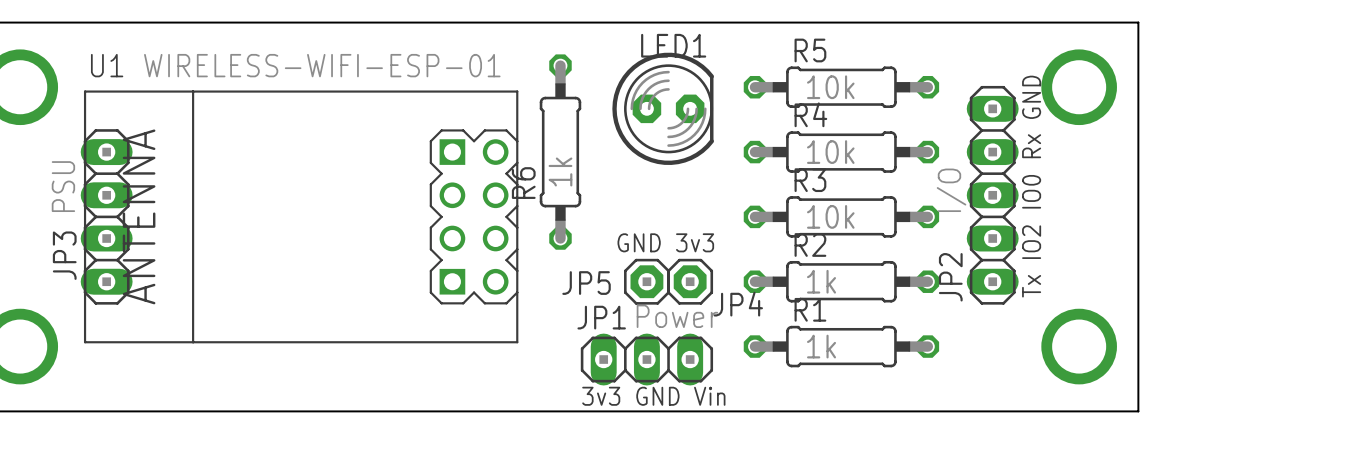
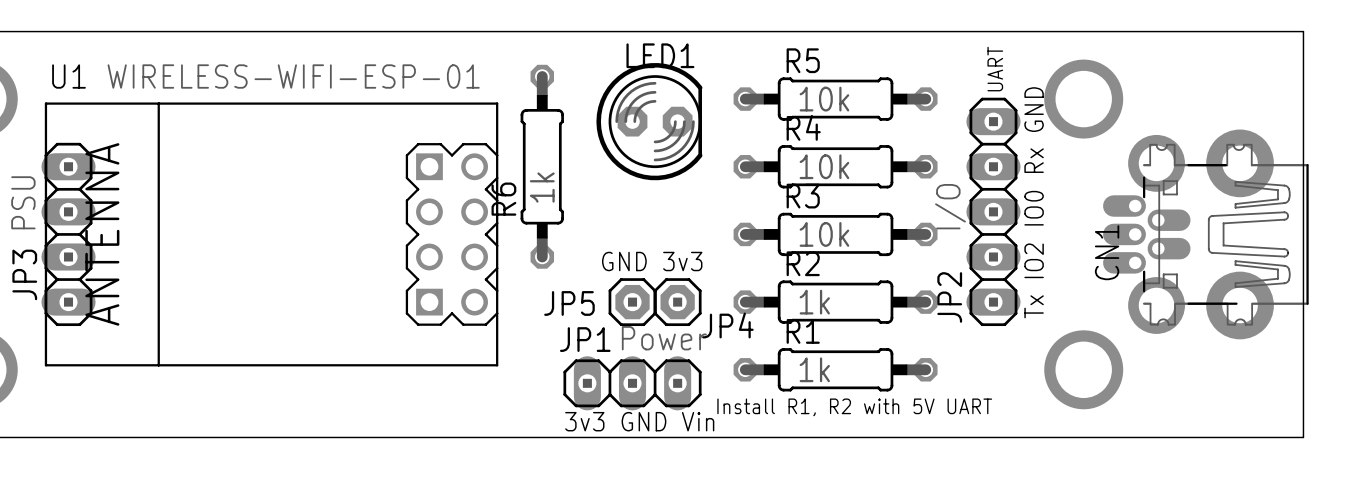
board edge: (1138, 22) (1138, 411) -> (1145, 31) (1303, 31) (1303, 437) (1145, 437)
text: none -> UART (995, 69)
CN1: none -> (1205, 234)
text: none -> Install R1, R2 with 5V UART (854, 407)

